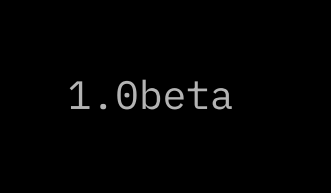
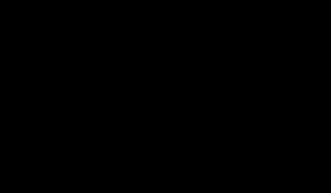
label: 1.0beta (150, 94) -> none

